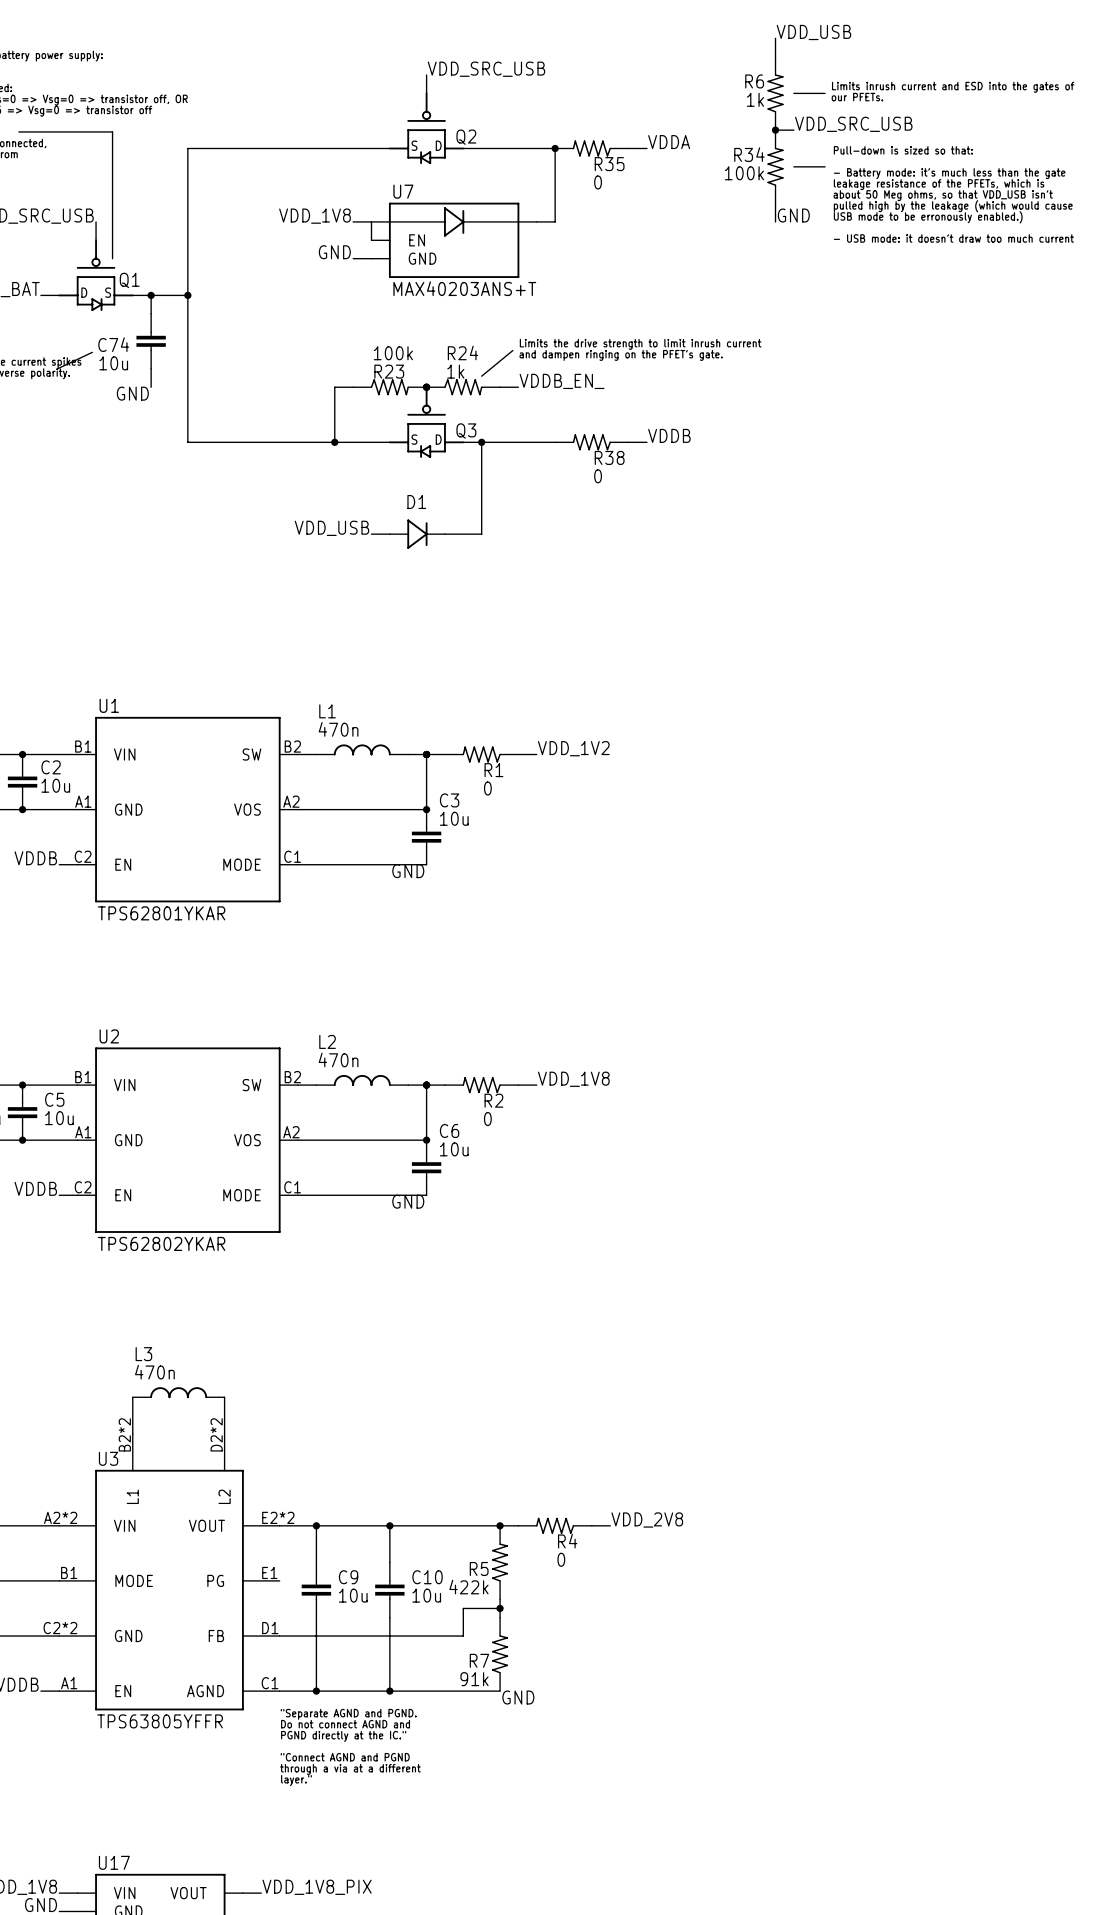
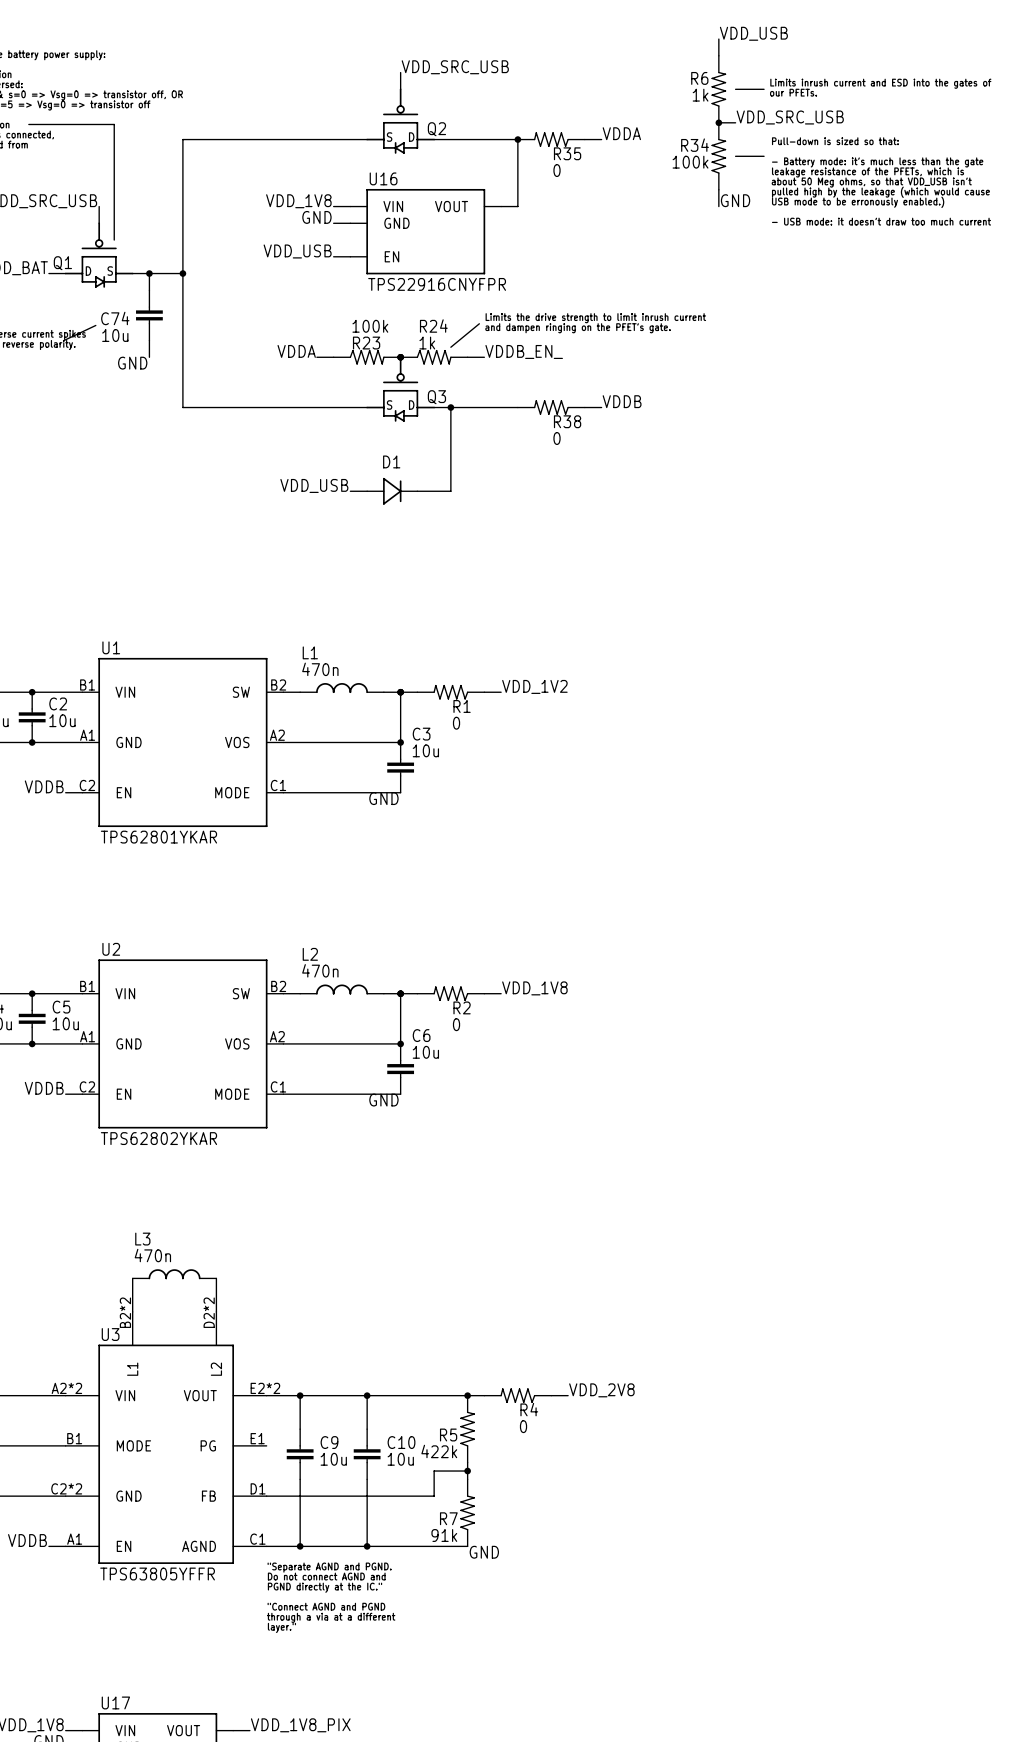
wire: (371, 221) (371, 240) -> (333, 223) (350, 223)
U7: (454, 240) -> none
U16: none -> (425, 231)
label position: GND (334, 252) -> GND (316, 217)
wire: (353, 258) (371, 258) -> (333, 256) (350, 256)
label: none -> VDD_USB (297, 251)
Q1 name position: Q1 (129, 280) -> Q1 (62, 263)
label: none -> VDDA (296, 351)
wire: (334, 387) (334, 442) -> none
junction: (334, 442) -> none

